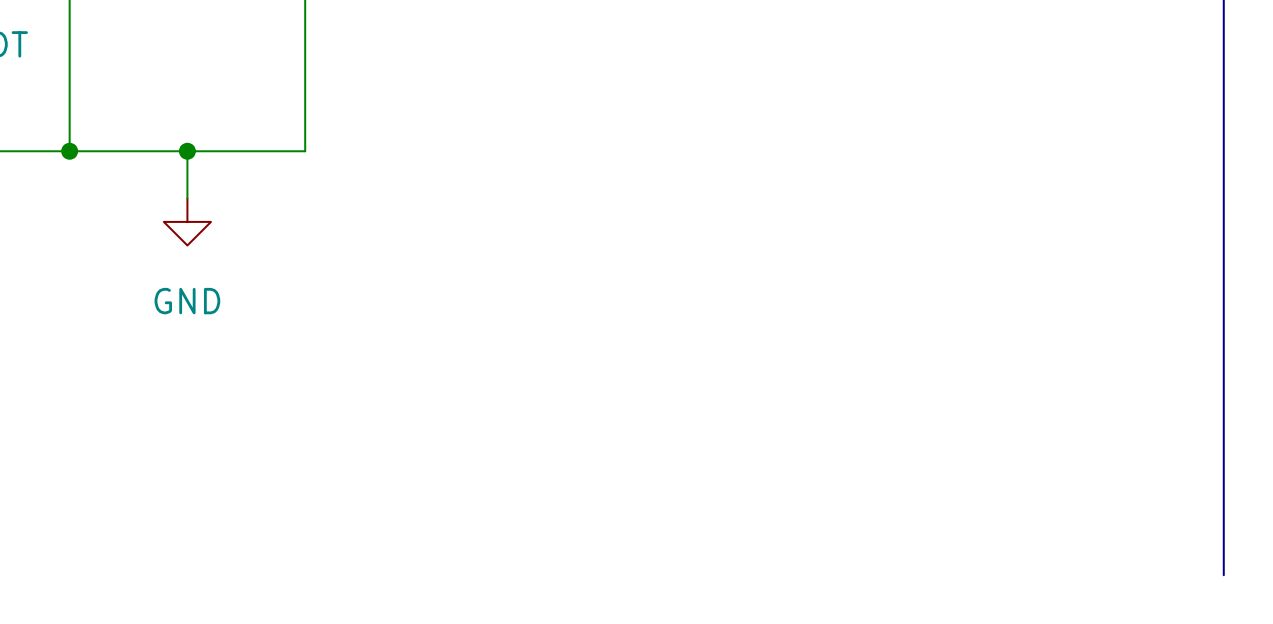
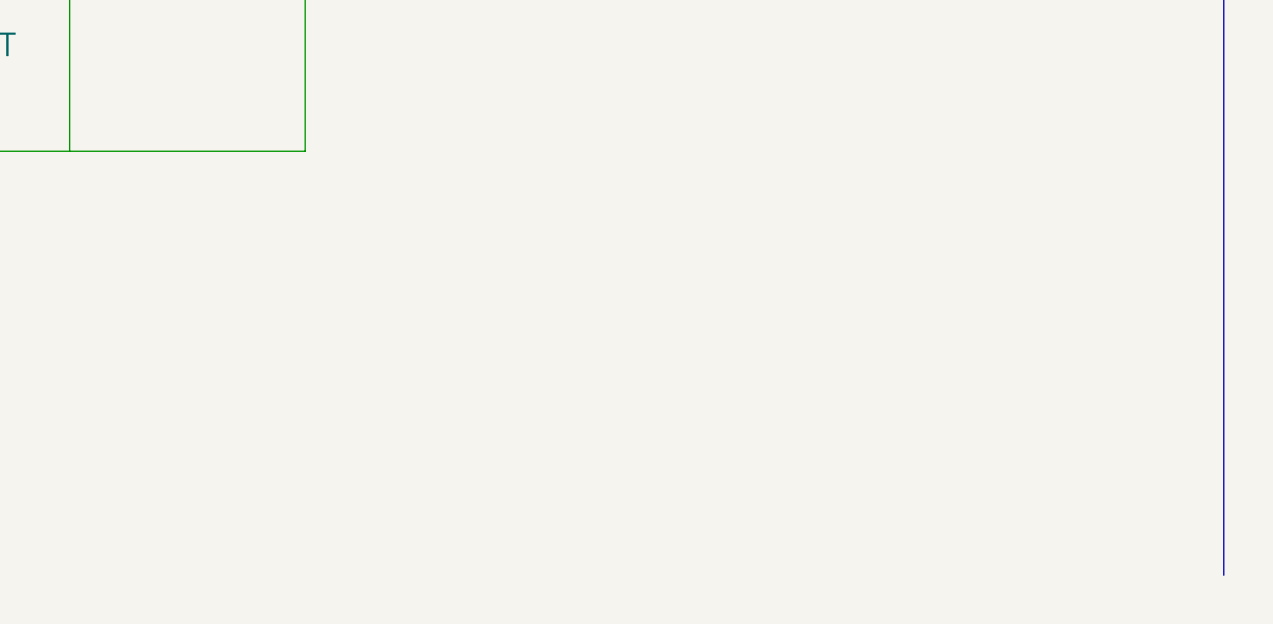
junction: (69, 151) -> none
wire: (187, 151) (187, 198) -> none
junction: (187, 151) -> none
power symbol: GND (187, 221) -> none

